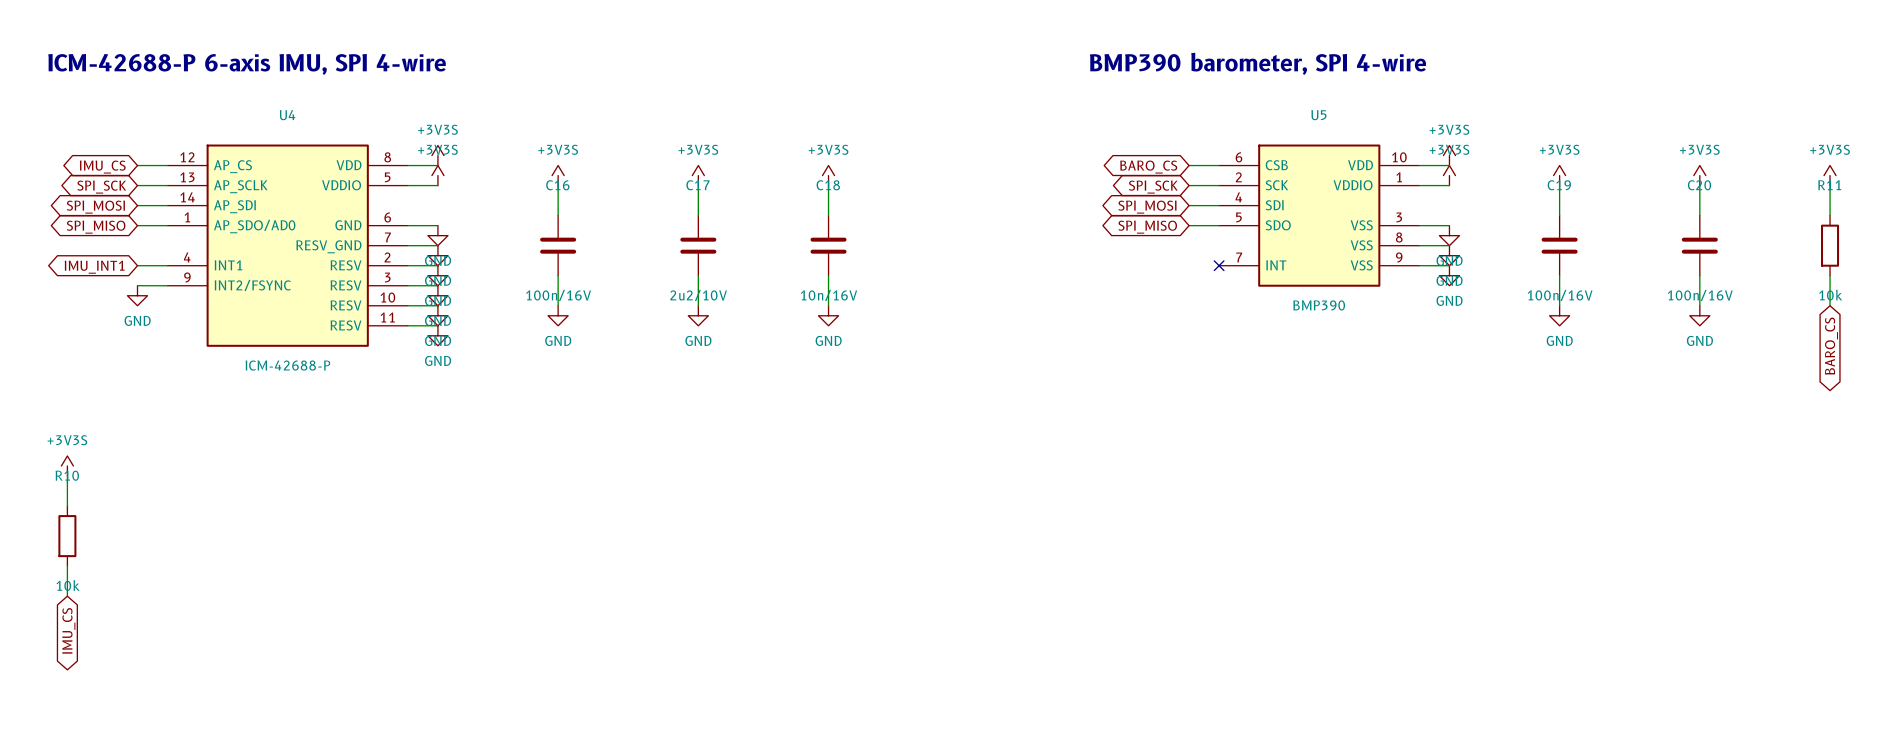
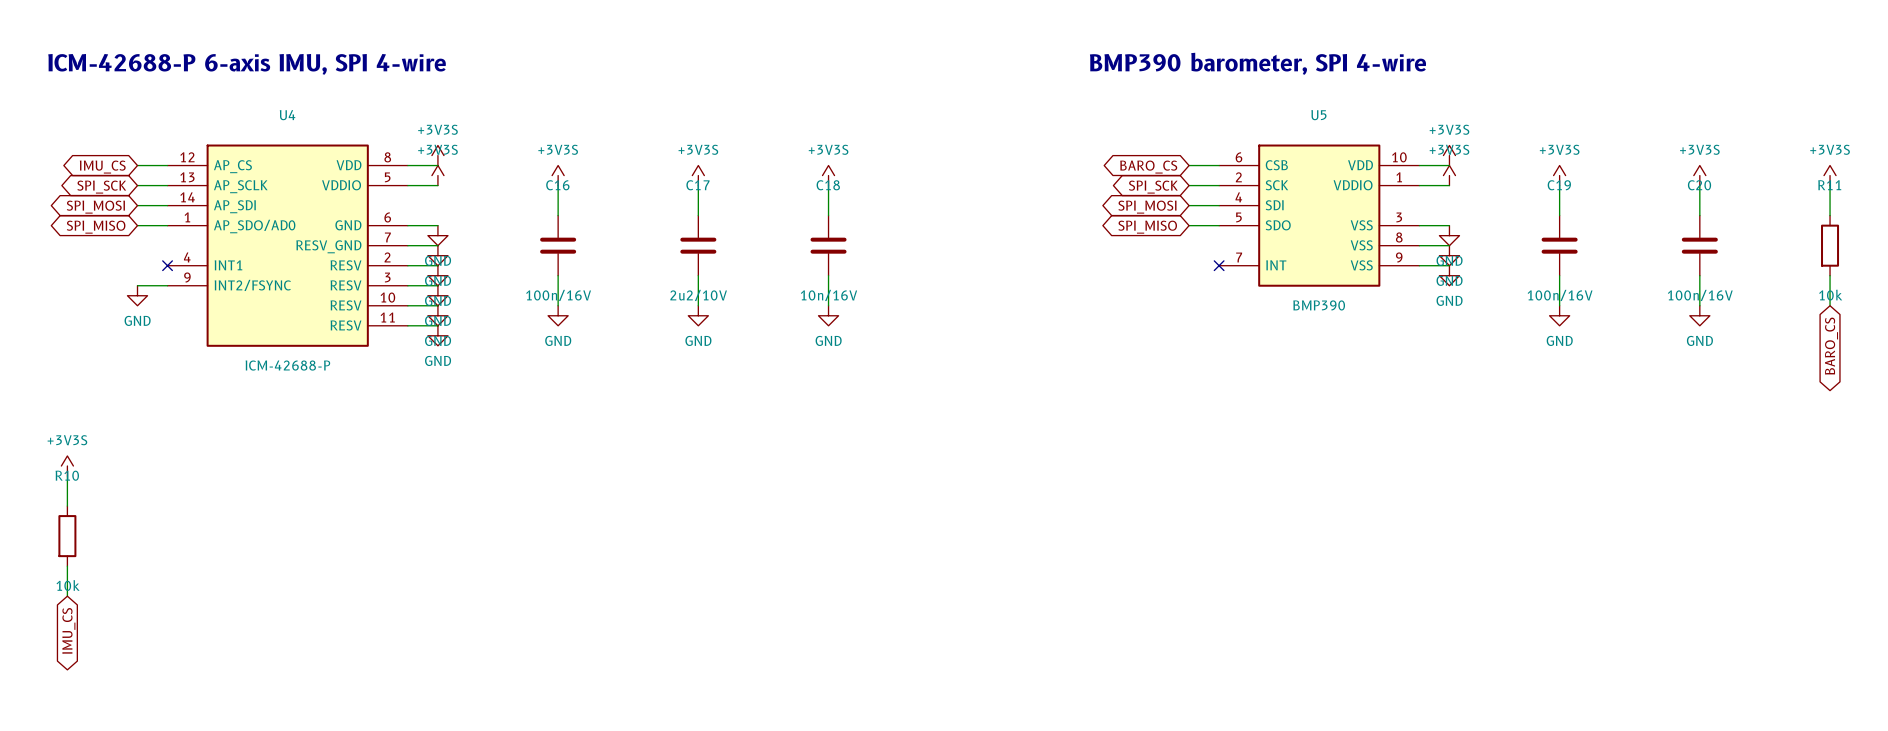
wire: (137, 265) (167, 265) -> none
no-connect mark: none -> (167, 265)
global label: IMU_INT1 (94, 267) -> none

